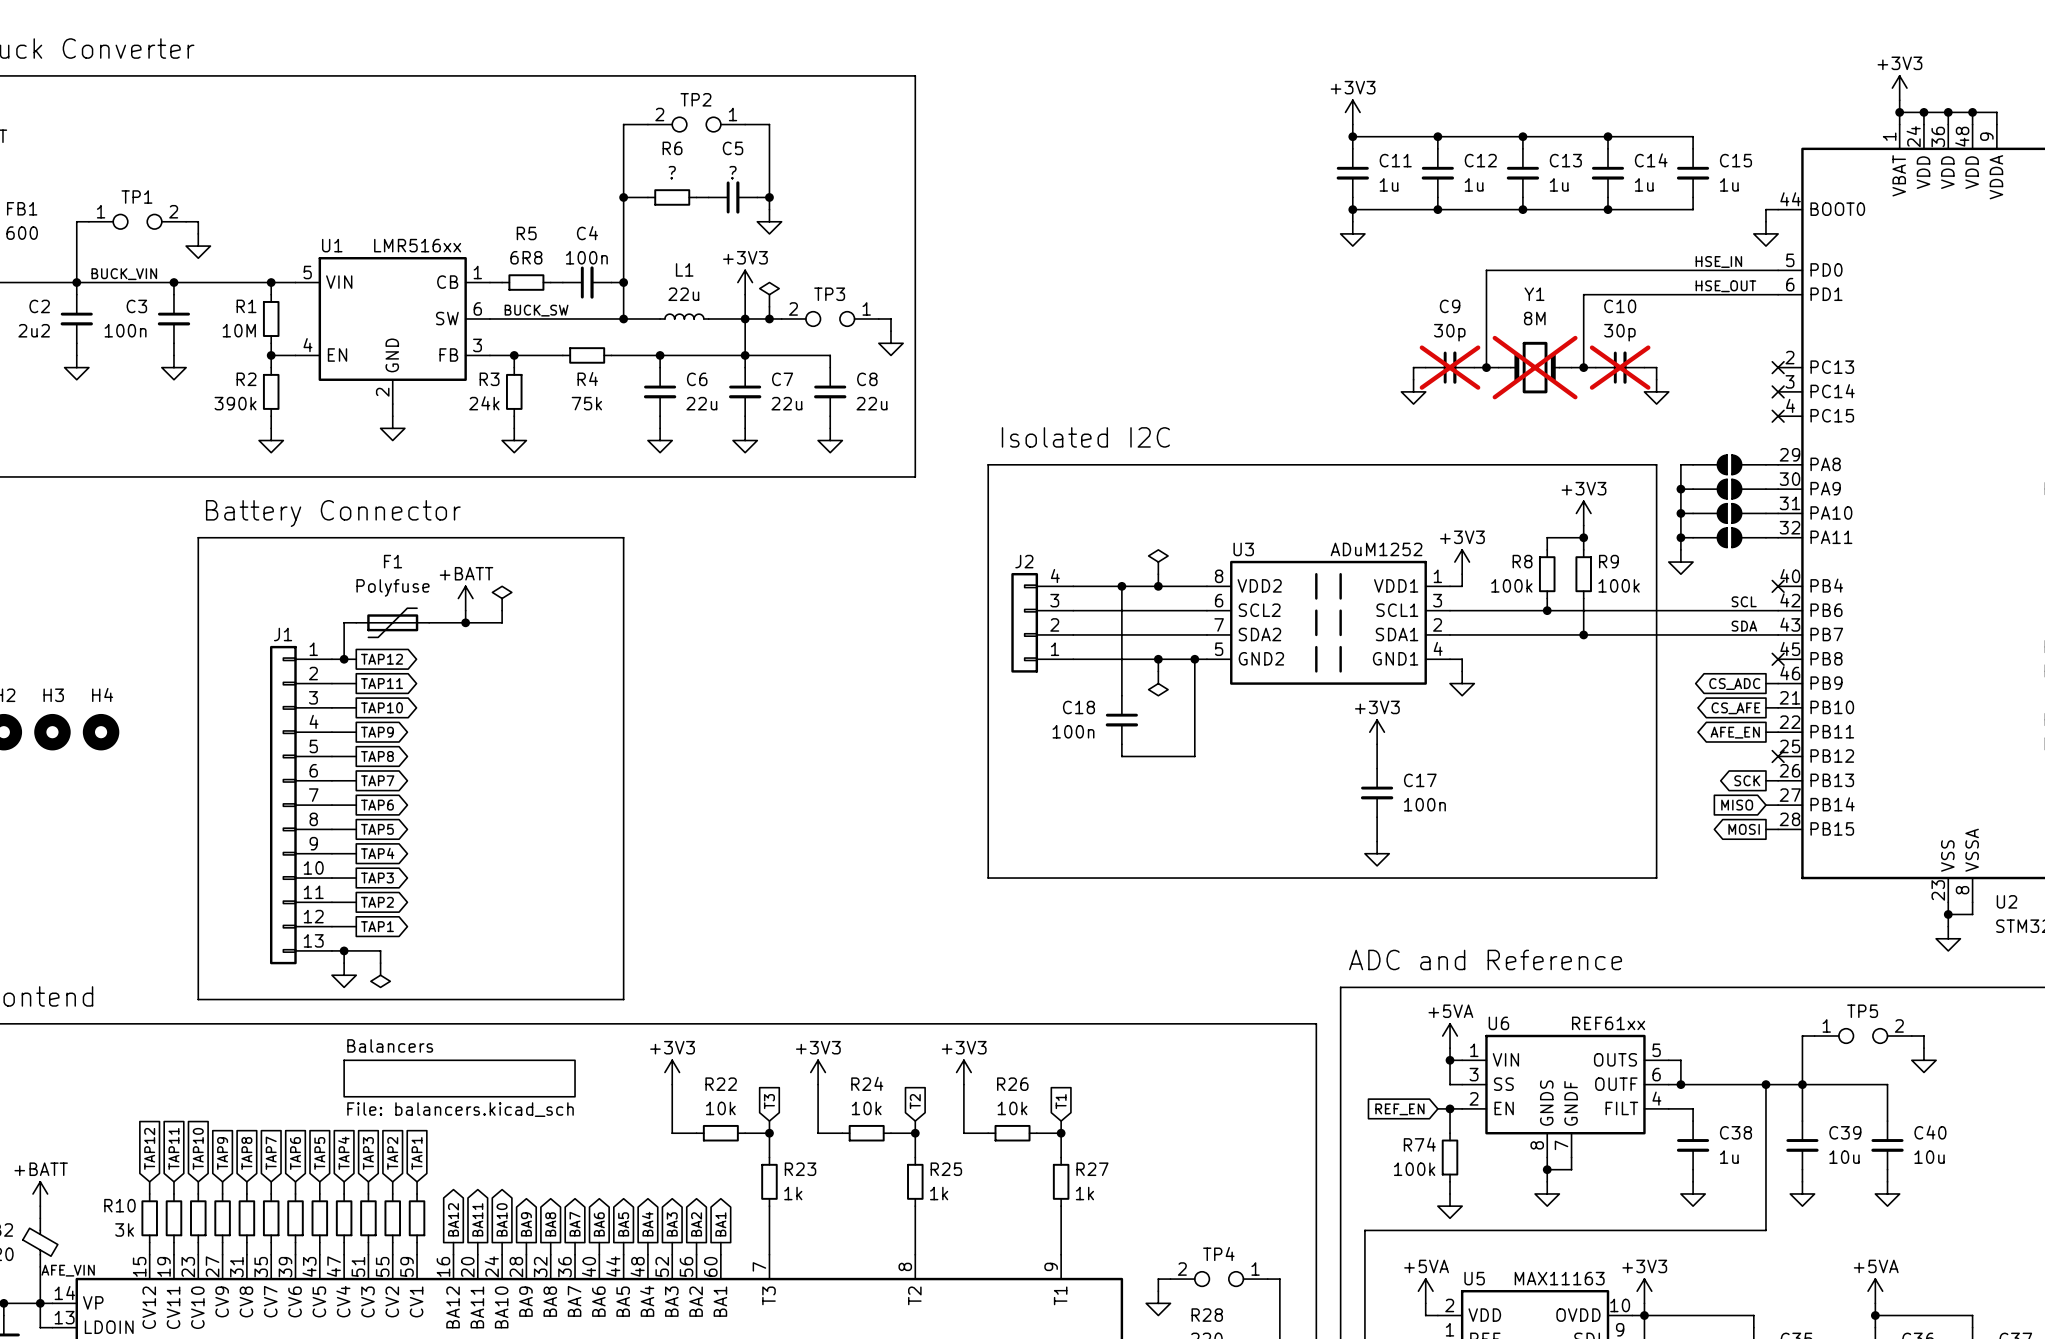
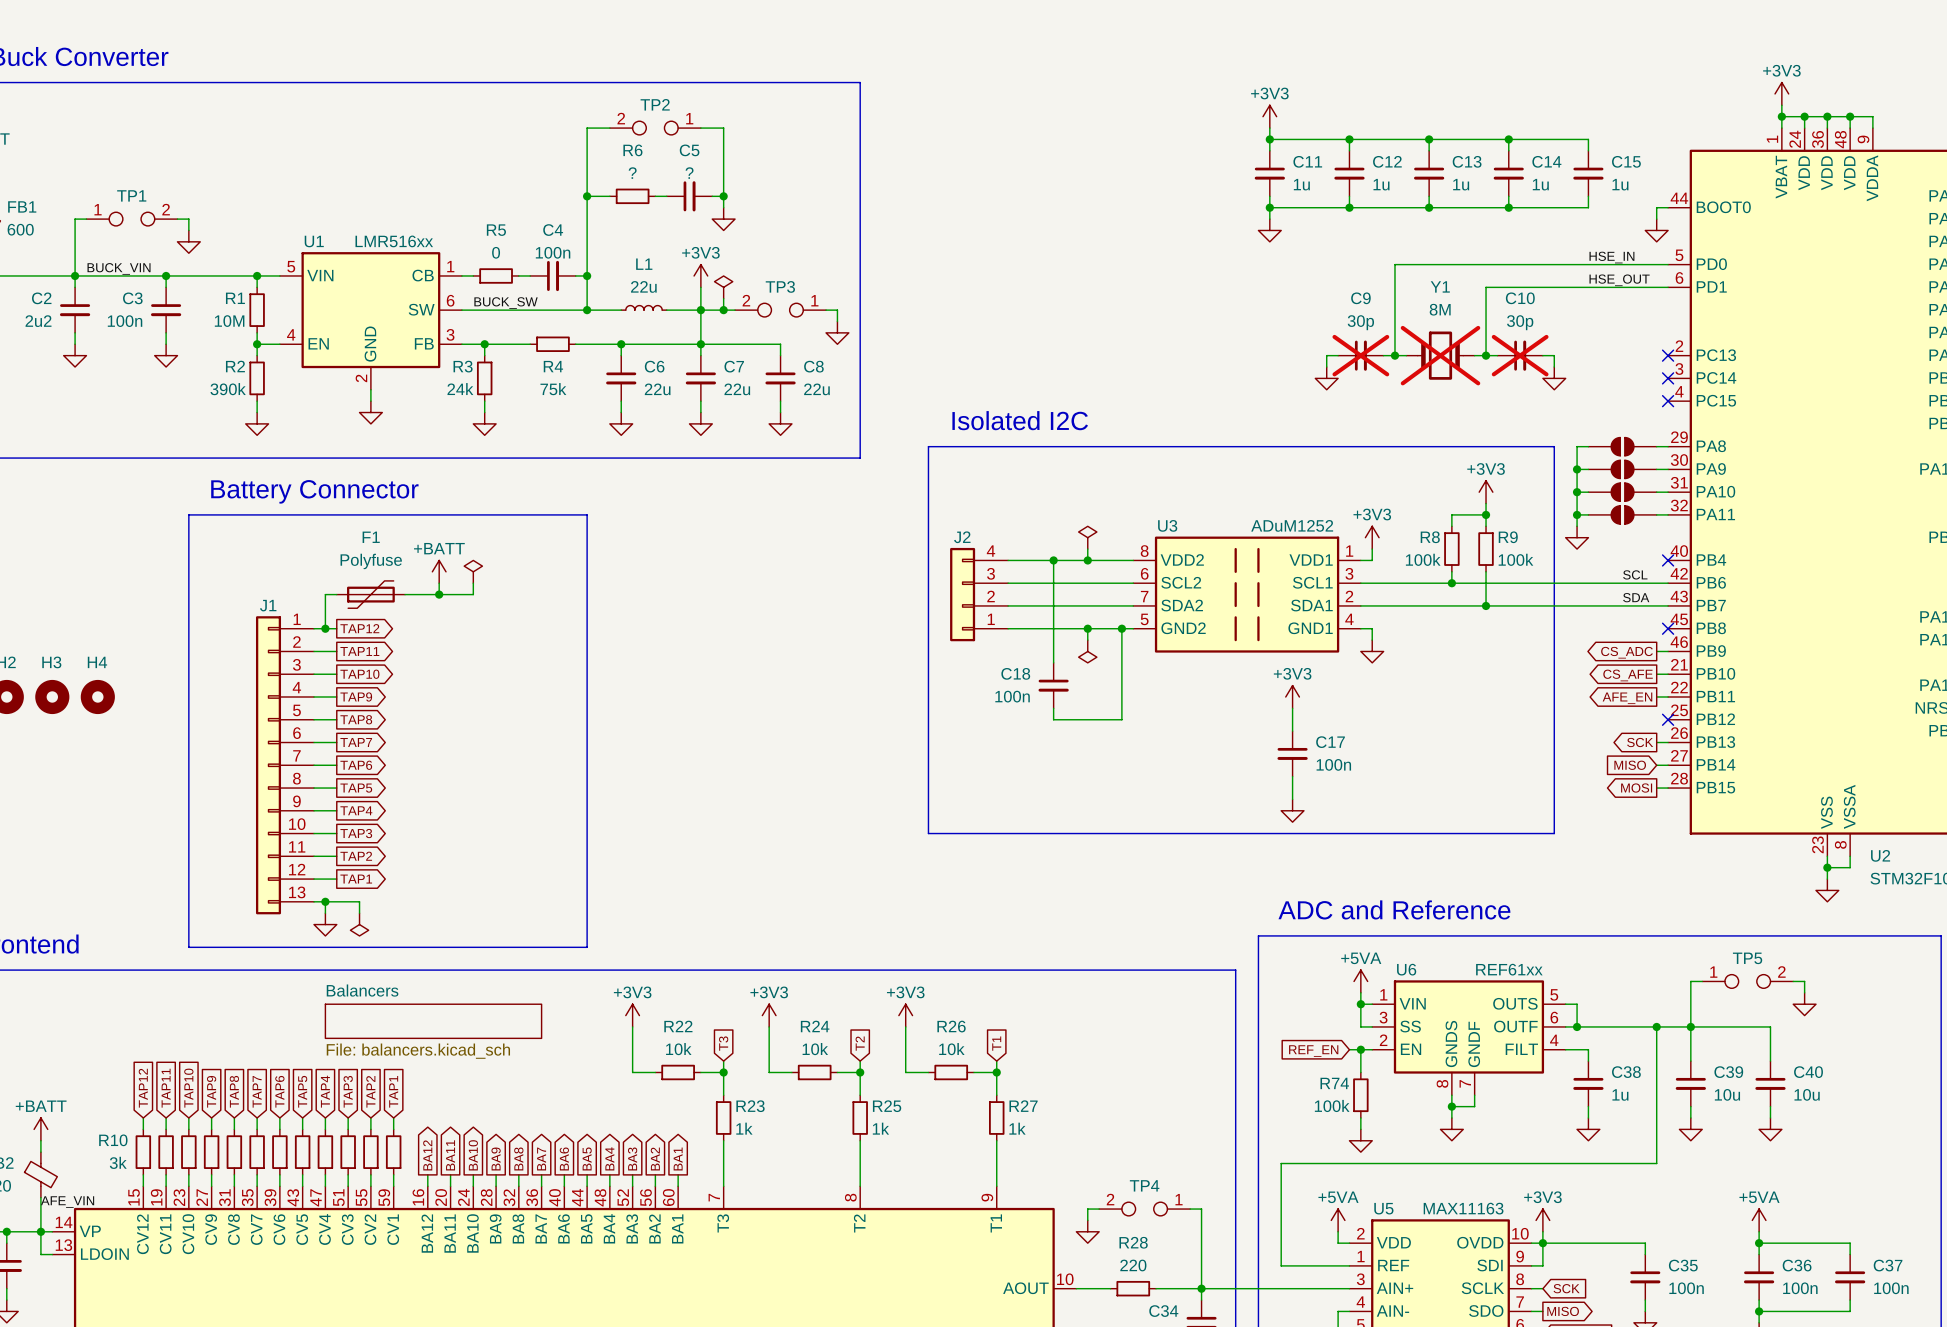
R5 value: 6R8 (526, 257) -> 0 (496, 252)

